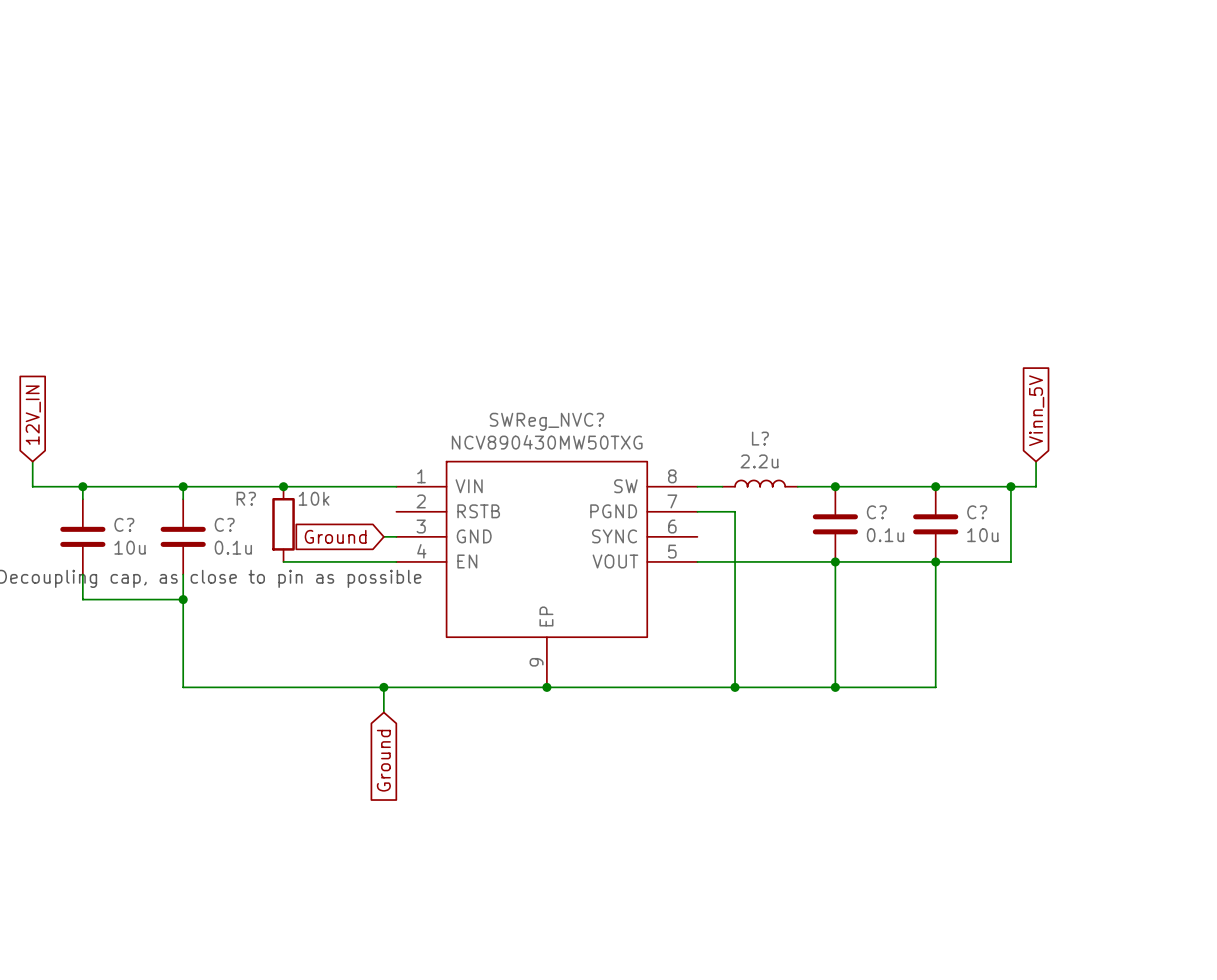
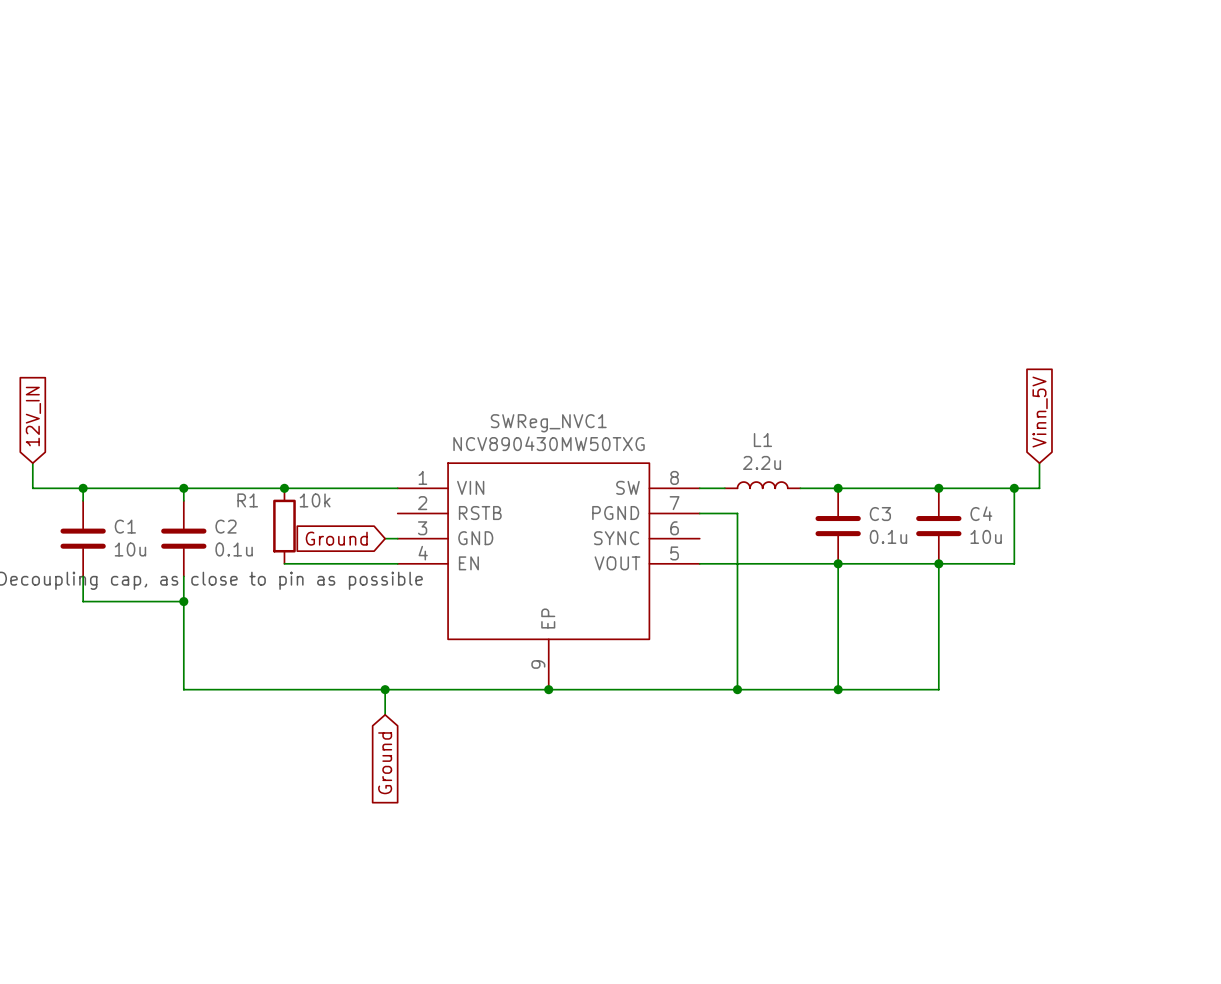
SWReg_NVC? name: SWReg_NVC? (546, 421) -> SWReg_NVC1 (548, 423)
L? name: L? (760, 438) -> L1 (762, 440)
R? name: R? (246, 498) -> R1 (247, 500)
C? name: C? (876, 512) -> C3 (880, 514)
C? name: C? (977, 512) -> C4 (981, 513)
C? name: C? (124, 524) -> C1 (125, 526)
C? name: C? (224, 524) -> C2 (226, 526)

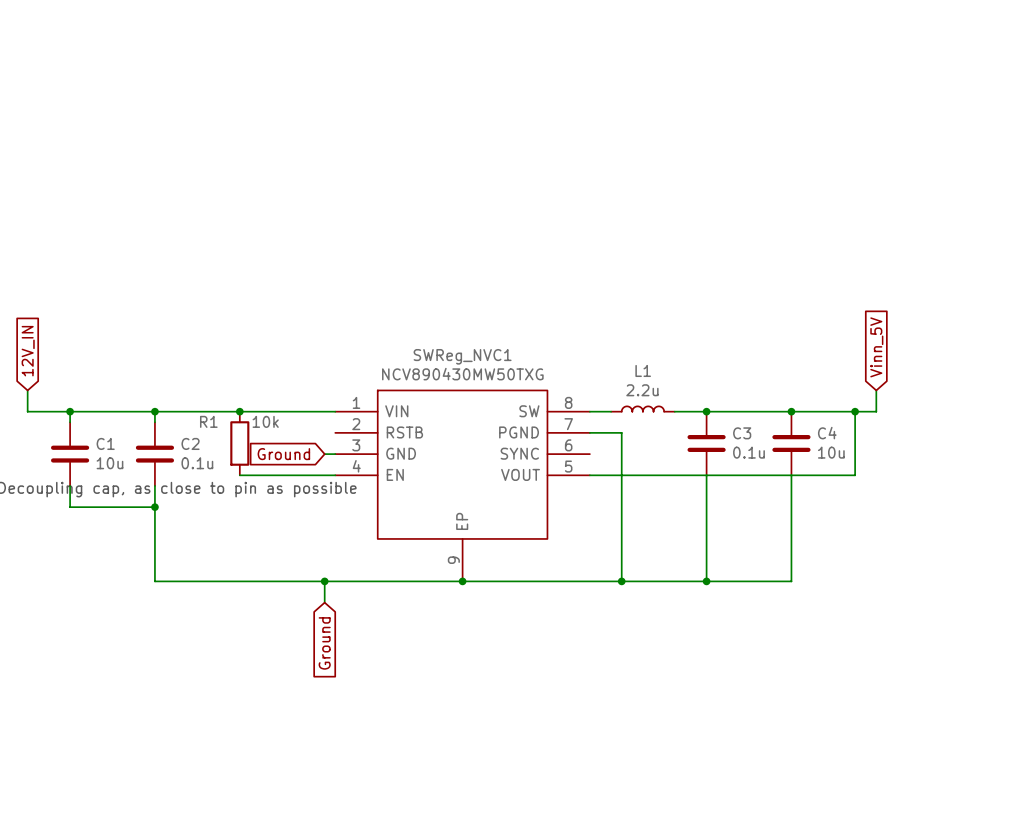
junction: (838, 563) -> none
junction: (938, 563) -> none

